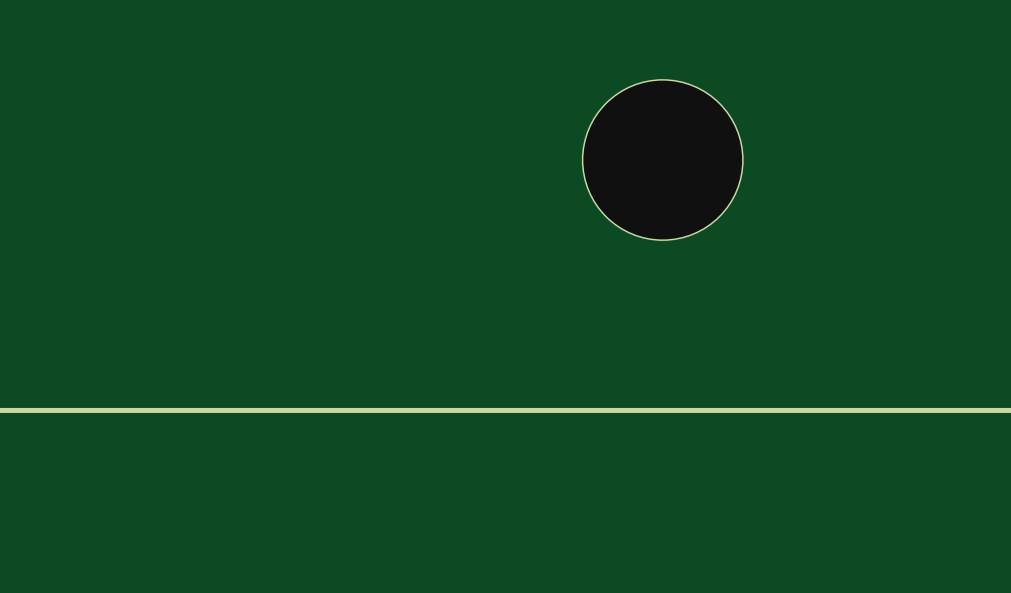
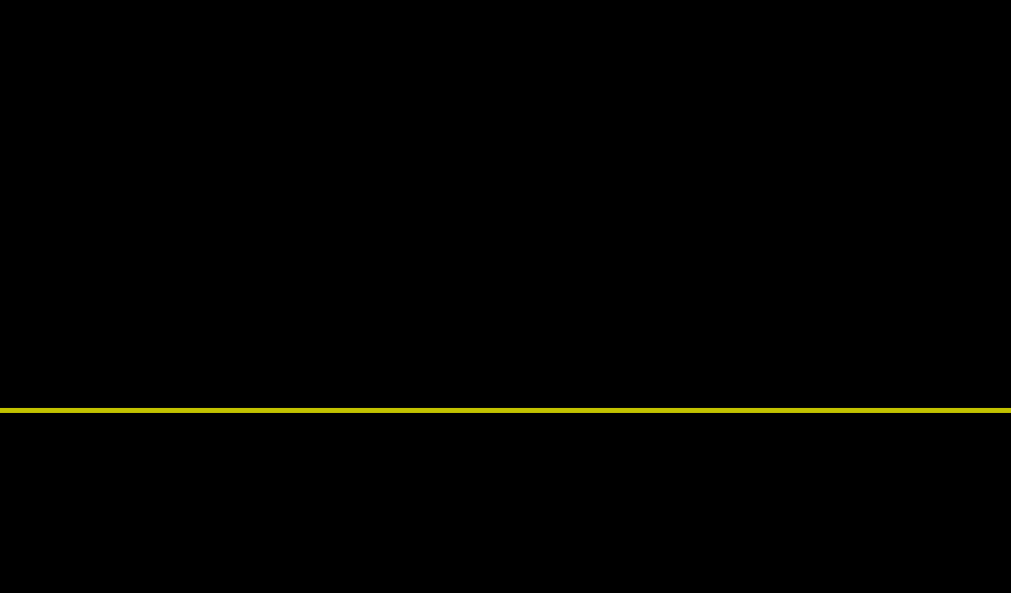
part: (662, 160) -> none

